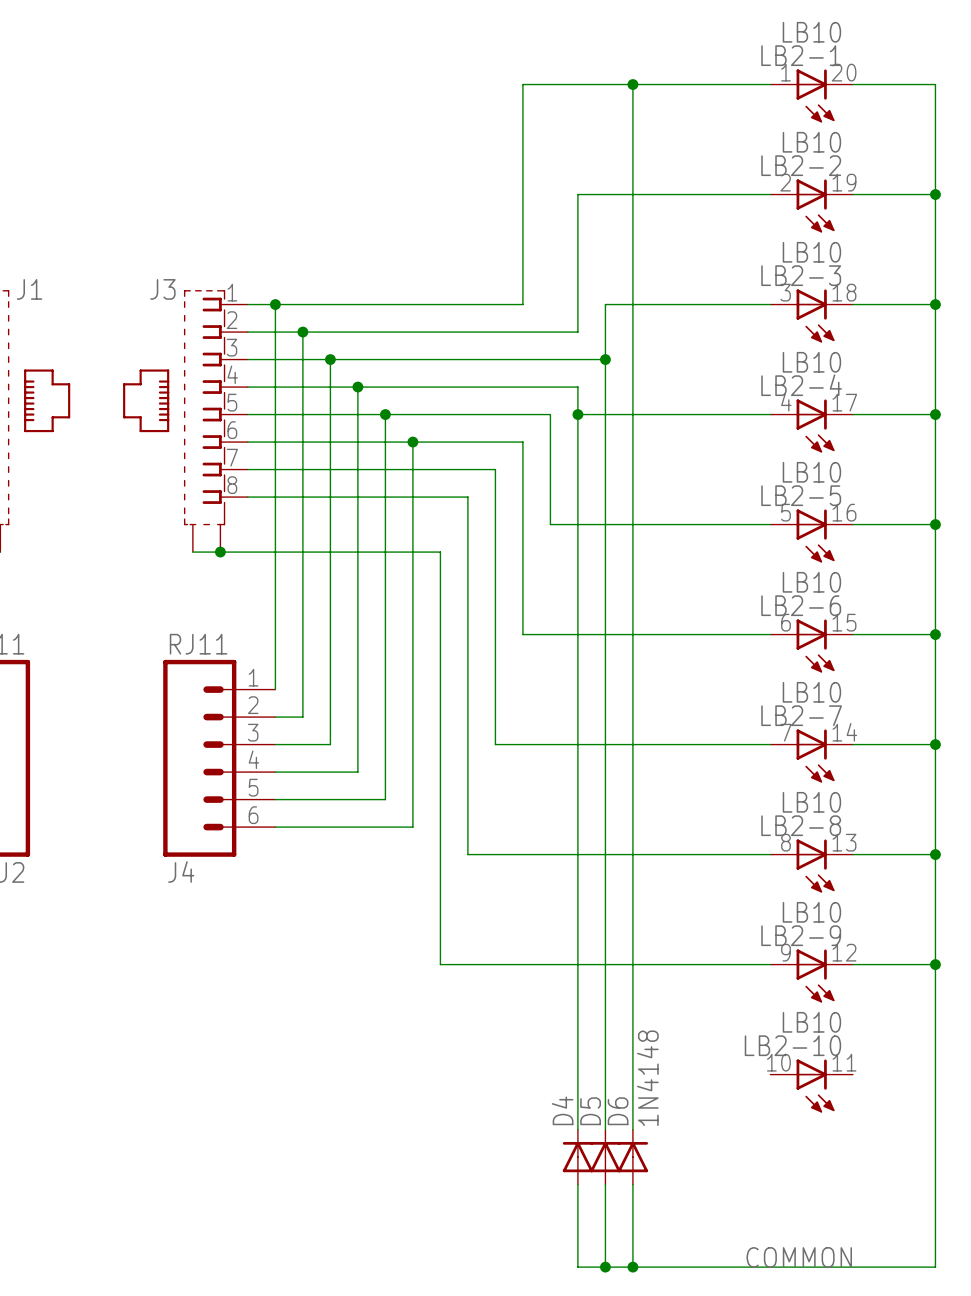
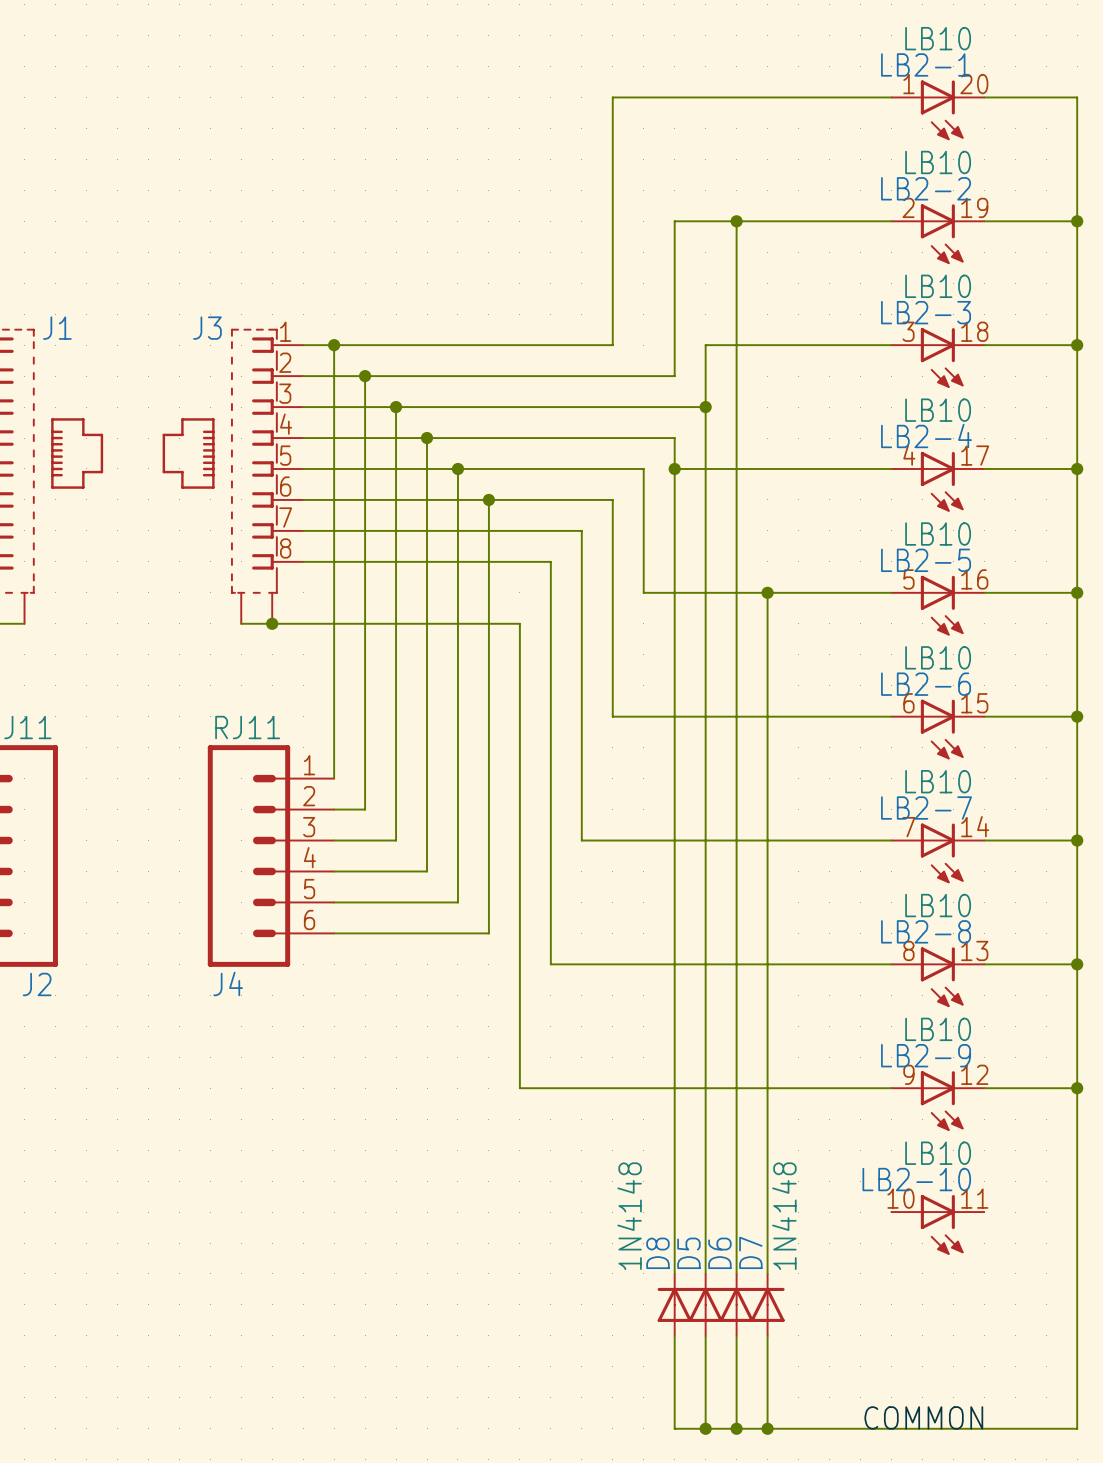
wire: (632, 84) (632, 194) -> none
junction: (632, 84) -> none
junction: none -> (736, 221)
wire: none -> (767, 592) (767, 1273)
junction: none -> (767, 592)
D6 value position: 1N4148 (647, 1078) -> 1N4148 (629, 1216)
D4 name: D4 (562, 1110) -> D8 (657, 1253)
D7: none -> 1N4148 (767, 1304)
wire: none -> (767, 1335) (767, 1428)
junction: none -> (767, 1428)

